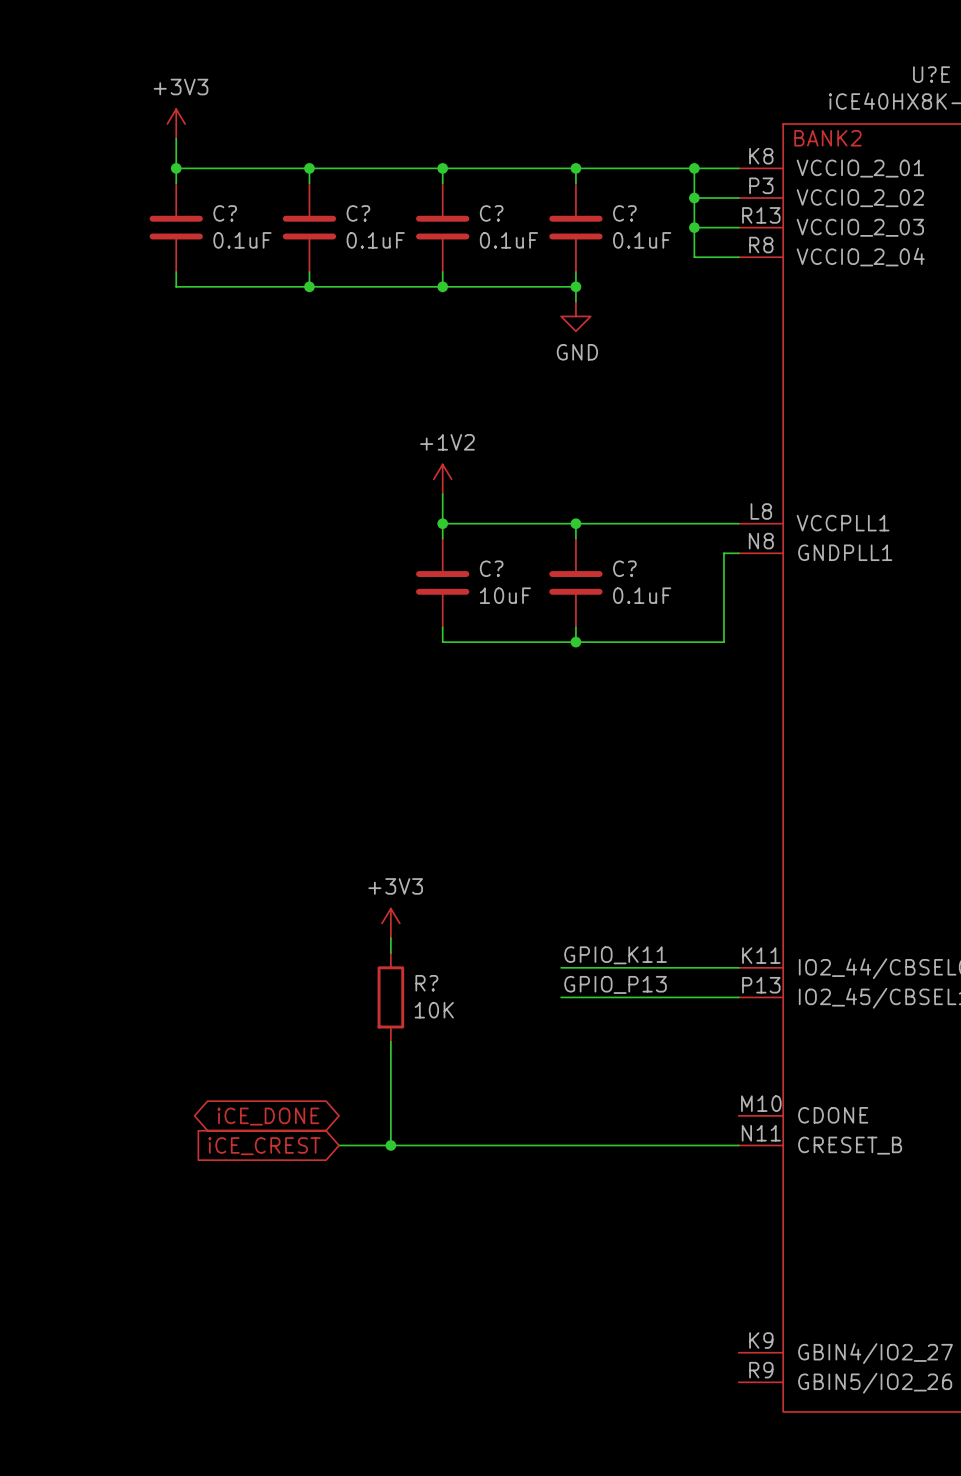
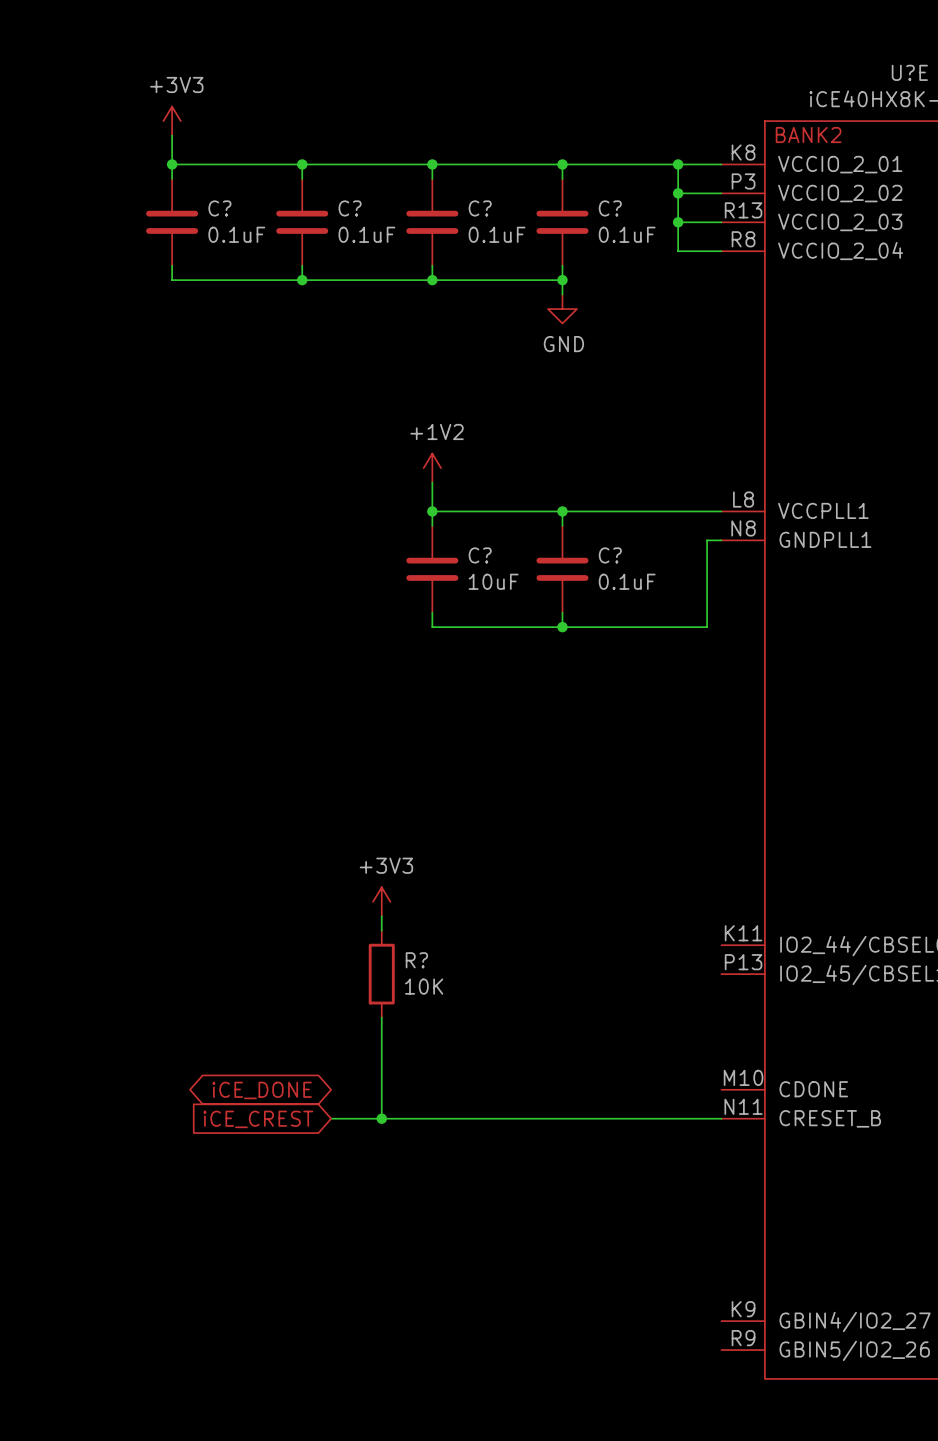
label: GPIO_K11 (615, 955) -> none
wire: (561, 967) (738, 967) -> none
label: GPIO_P13 (615, 984) -> none
wire: (561, 997) (738, 997) -> none

